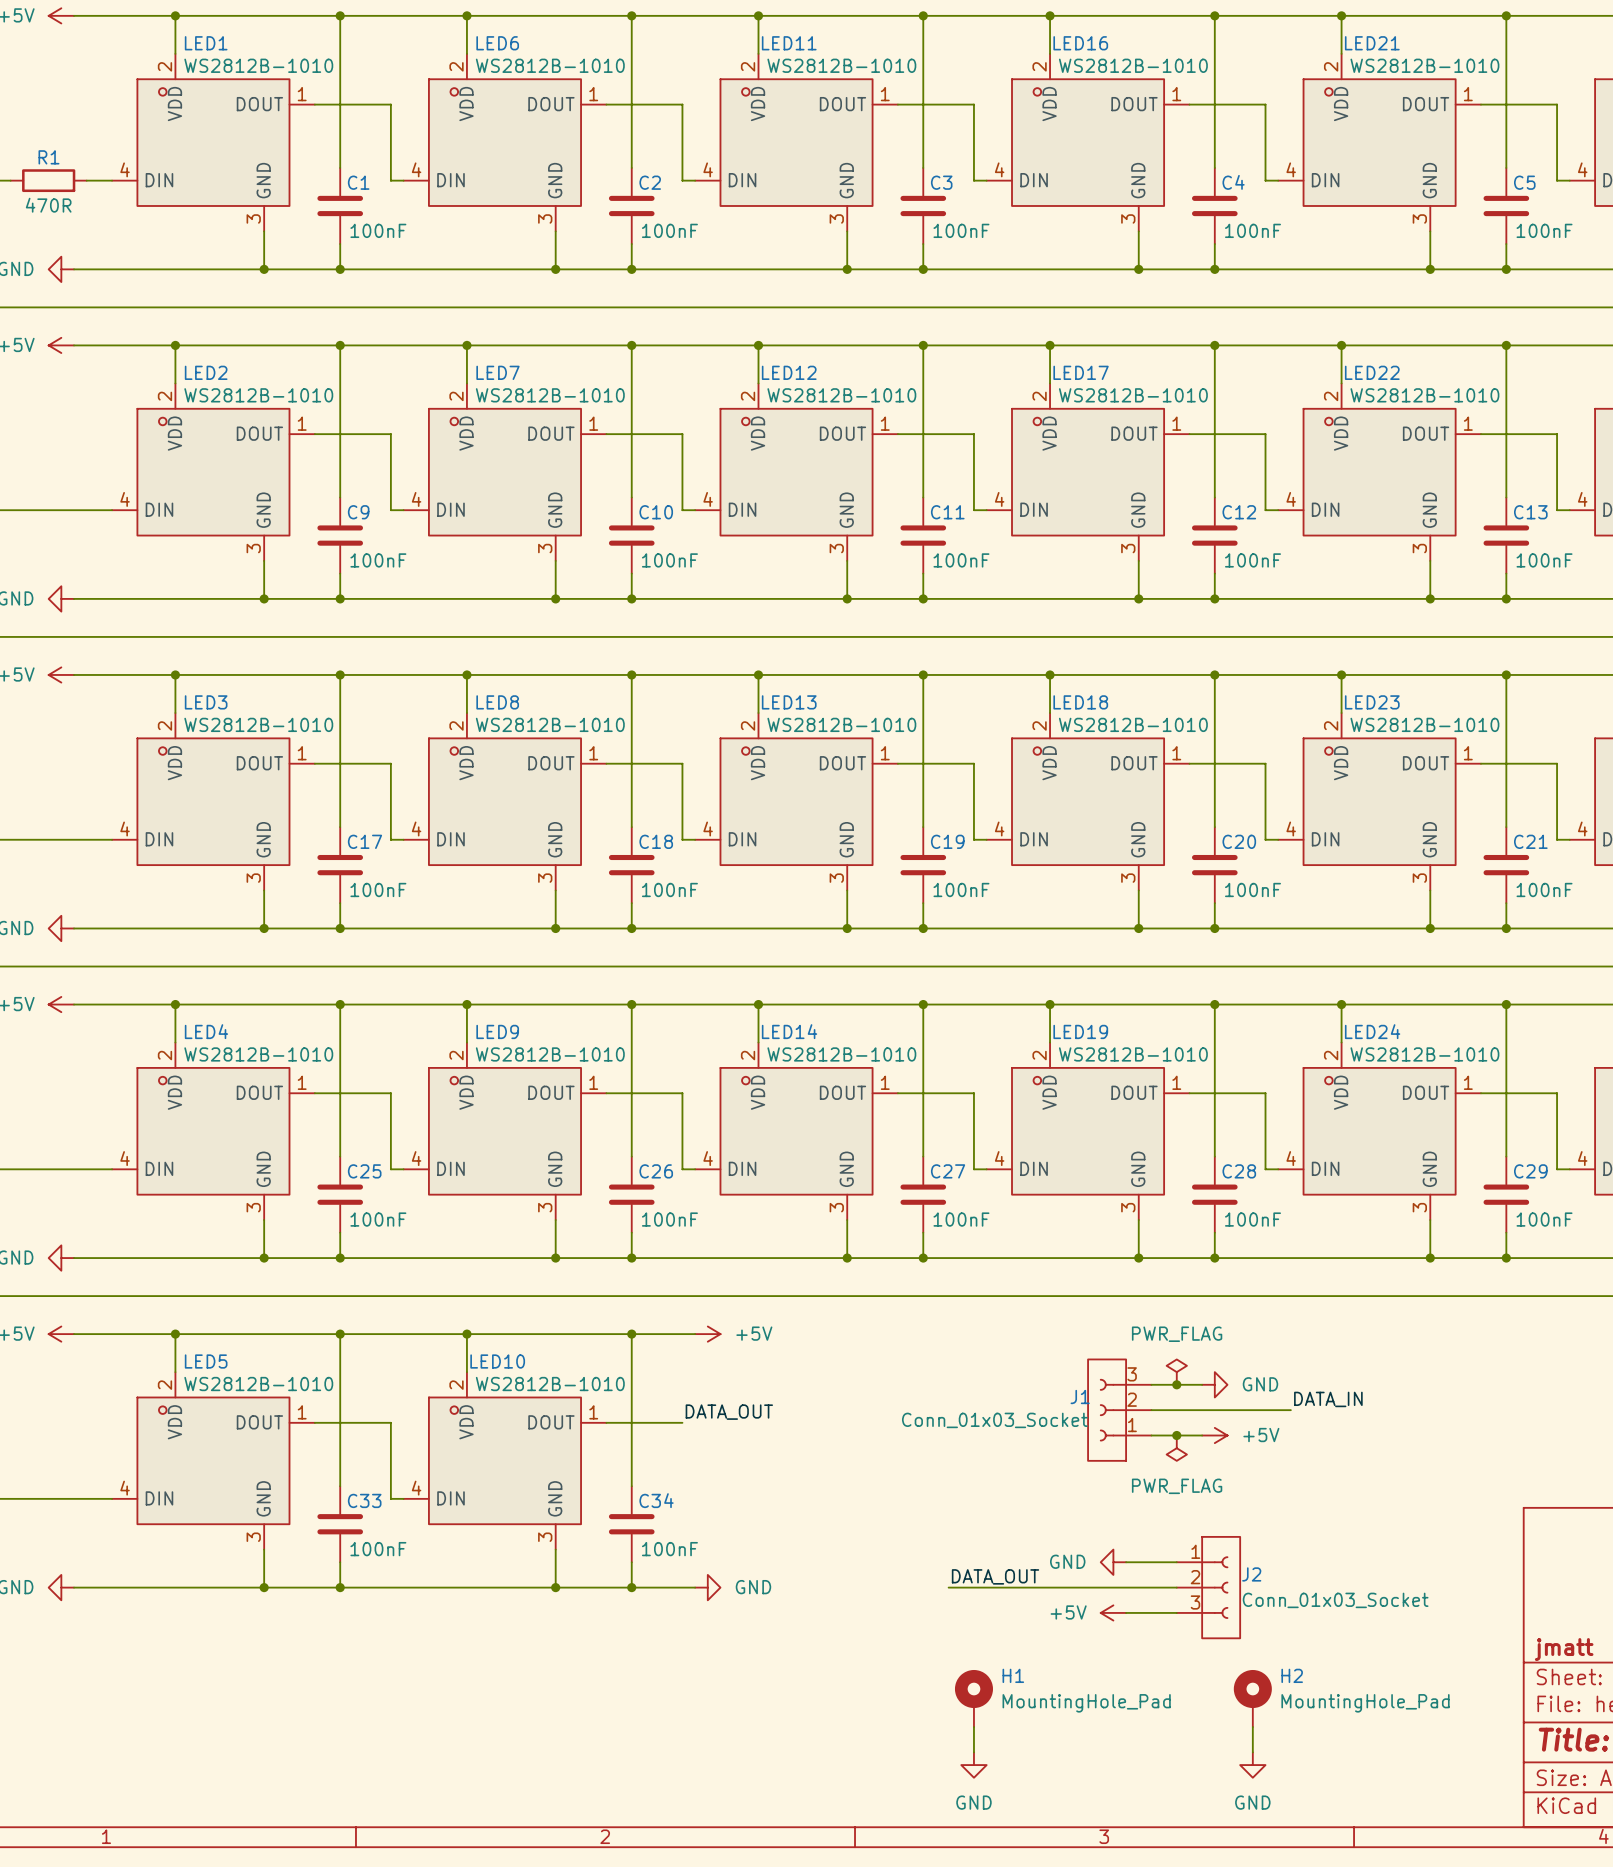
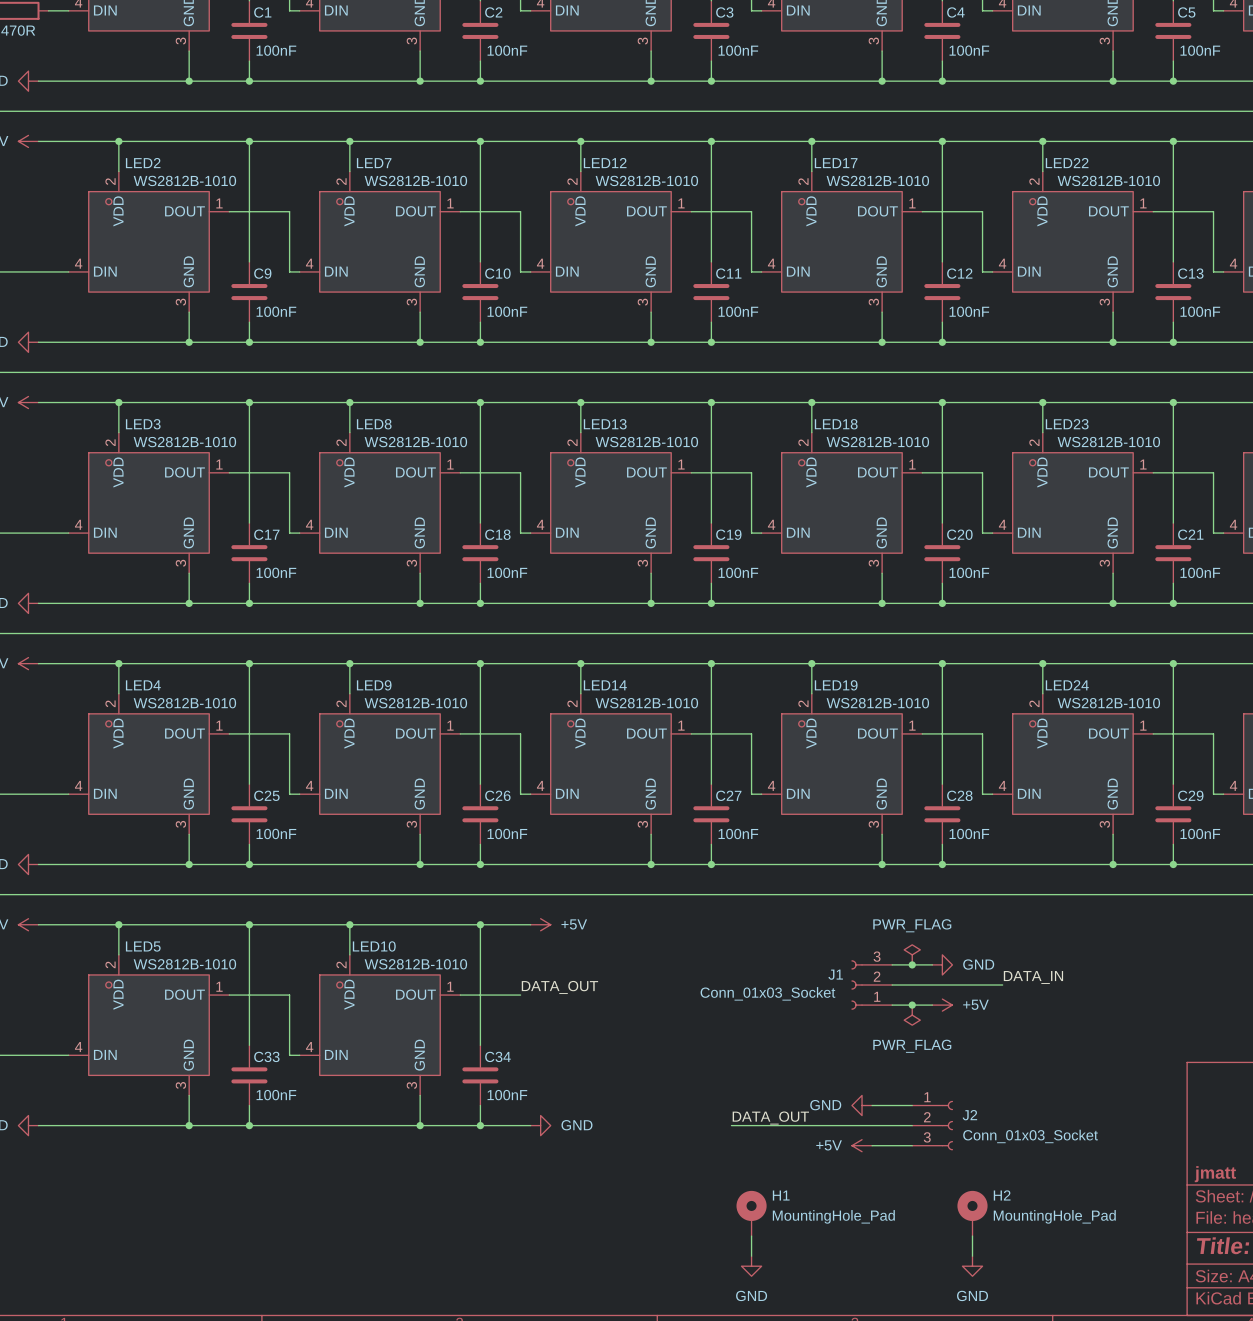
J1 symbol: [1088, 1359, 1152, 1461] -> [851, 960, 893, 1010]
J2 symbol: [1176, 1536, 1241, 1639] -> [912, 1100, 954, 1151]

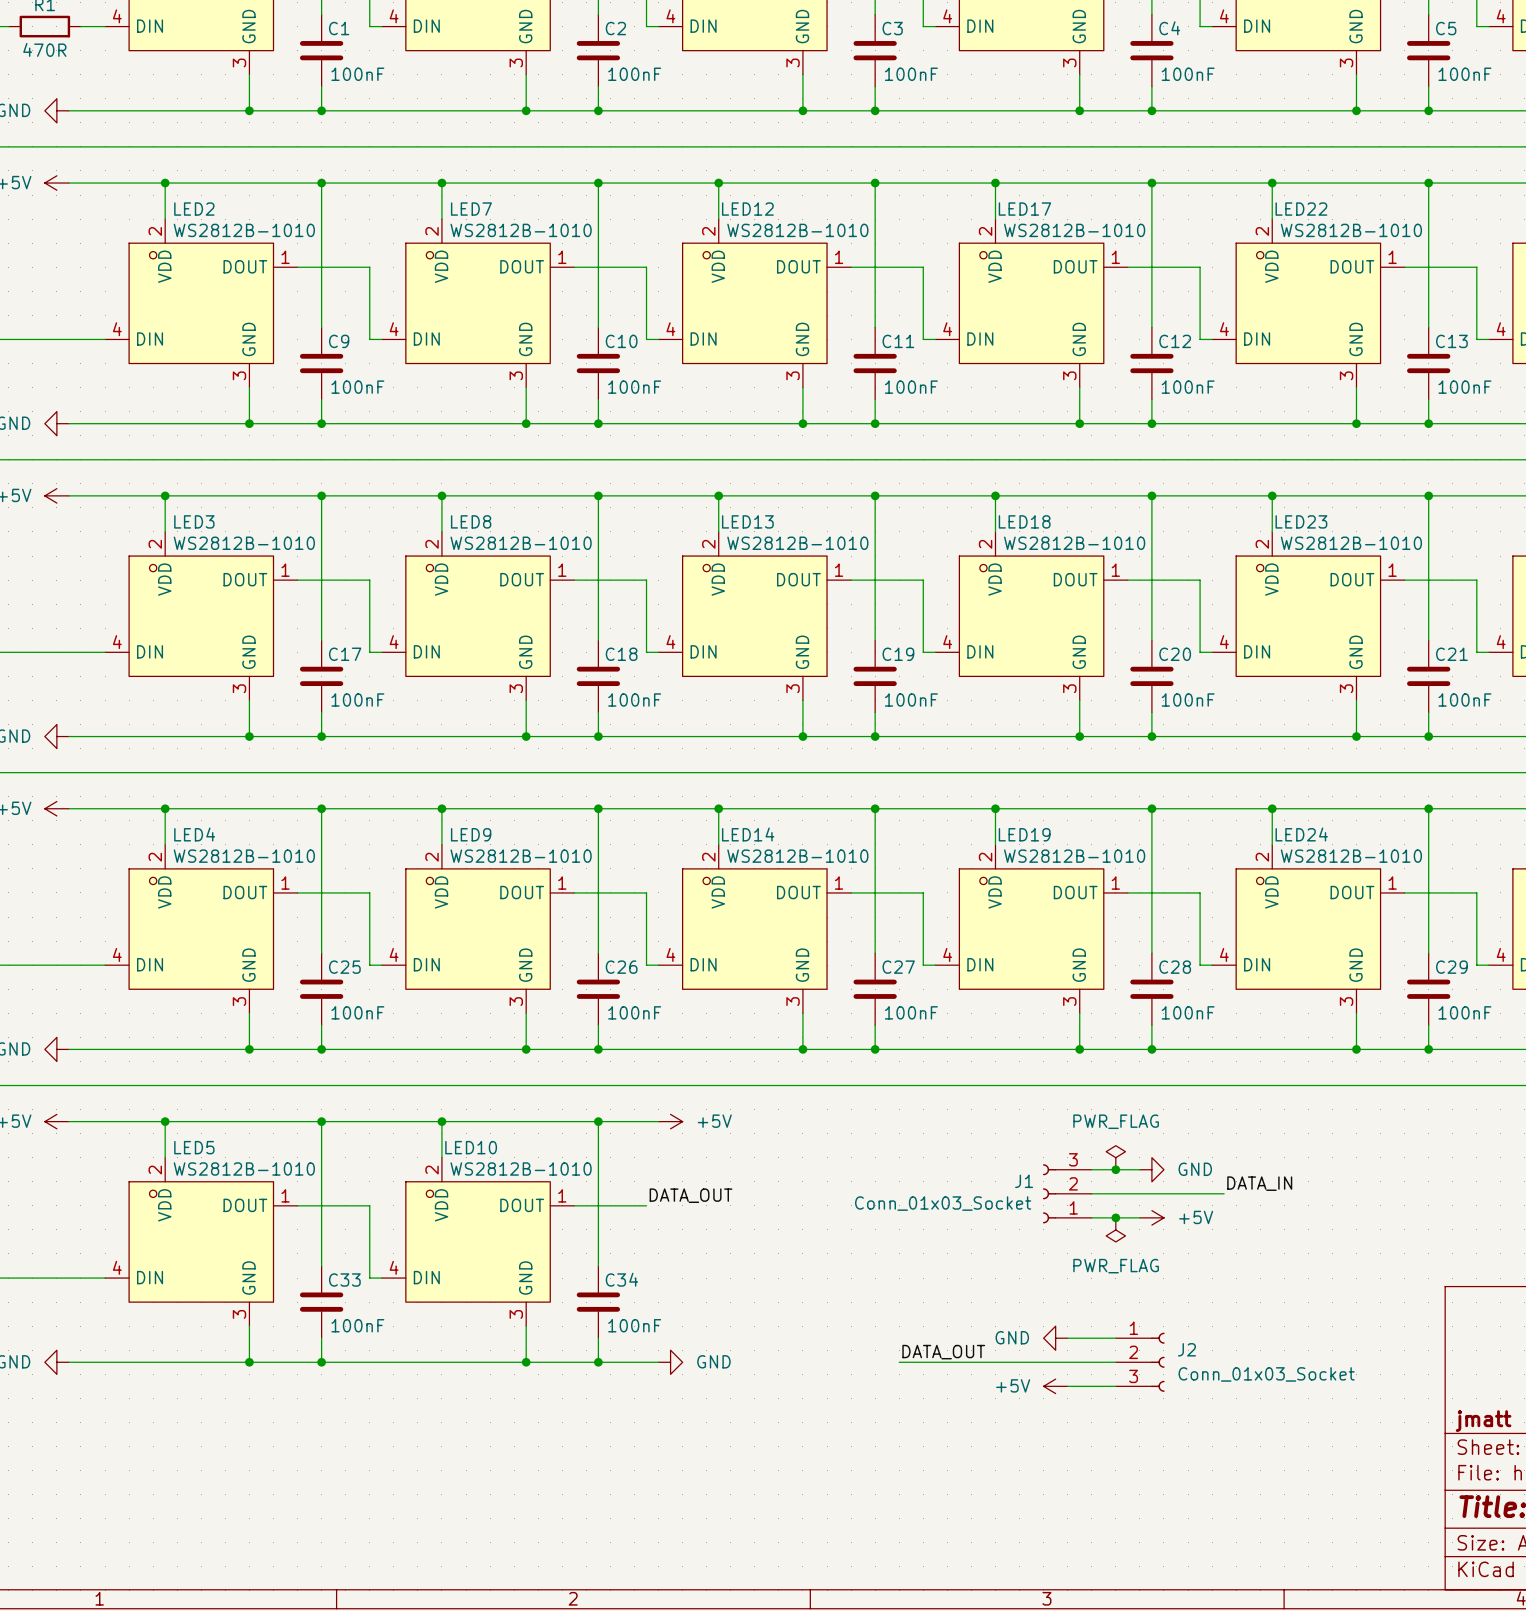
H1: MountingHole_Pad (751, 1213) -> none
H2: MountingHole_Pad (972, 1213) -> none
wire: (751, 1236) (751, 1256) -> none
wire: (972, 1236) (972, 1256) -> none
power symbol: GND (751, 1266) -> none
power symbol: GND (972, 1266) -> none

